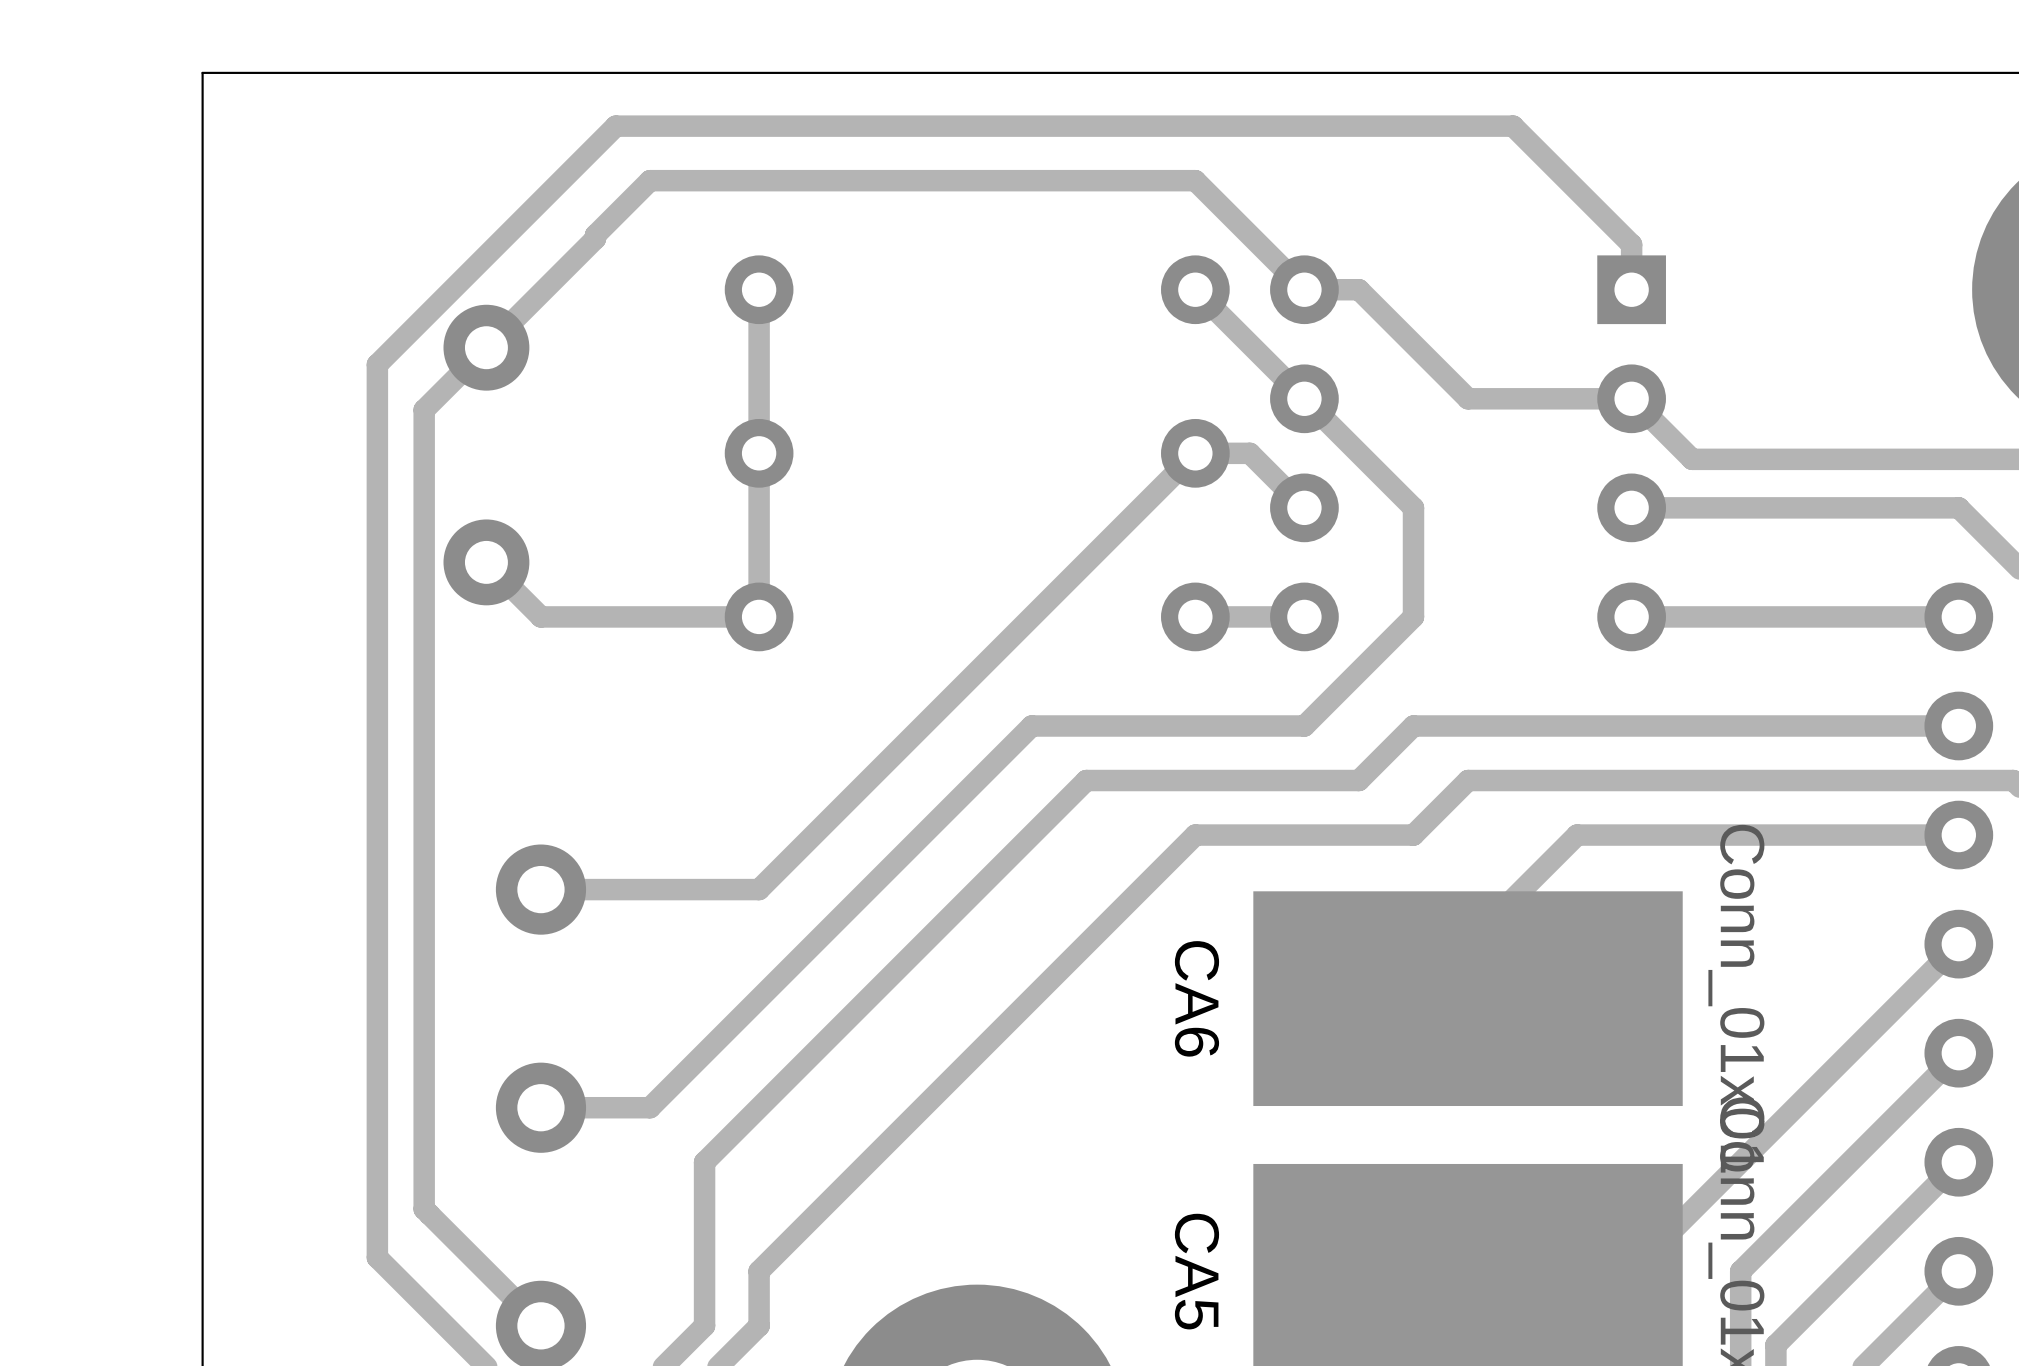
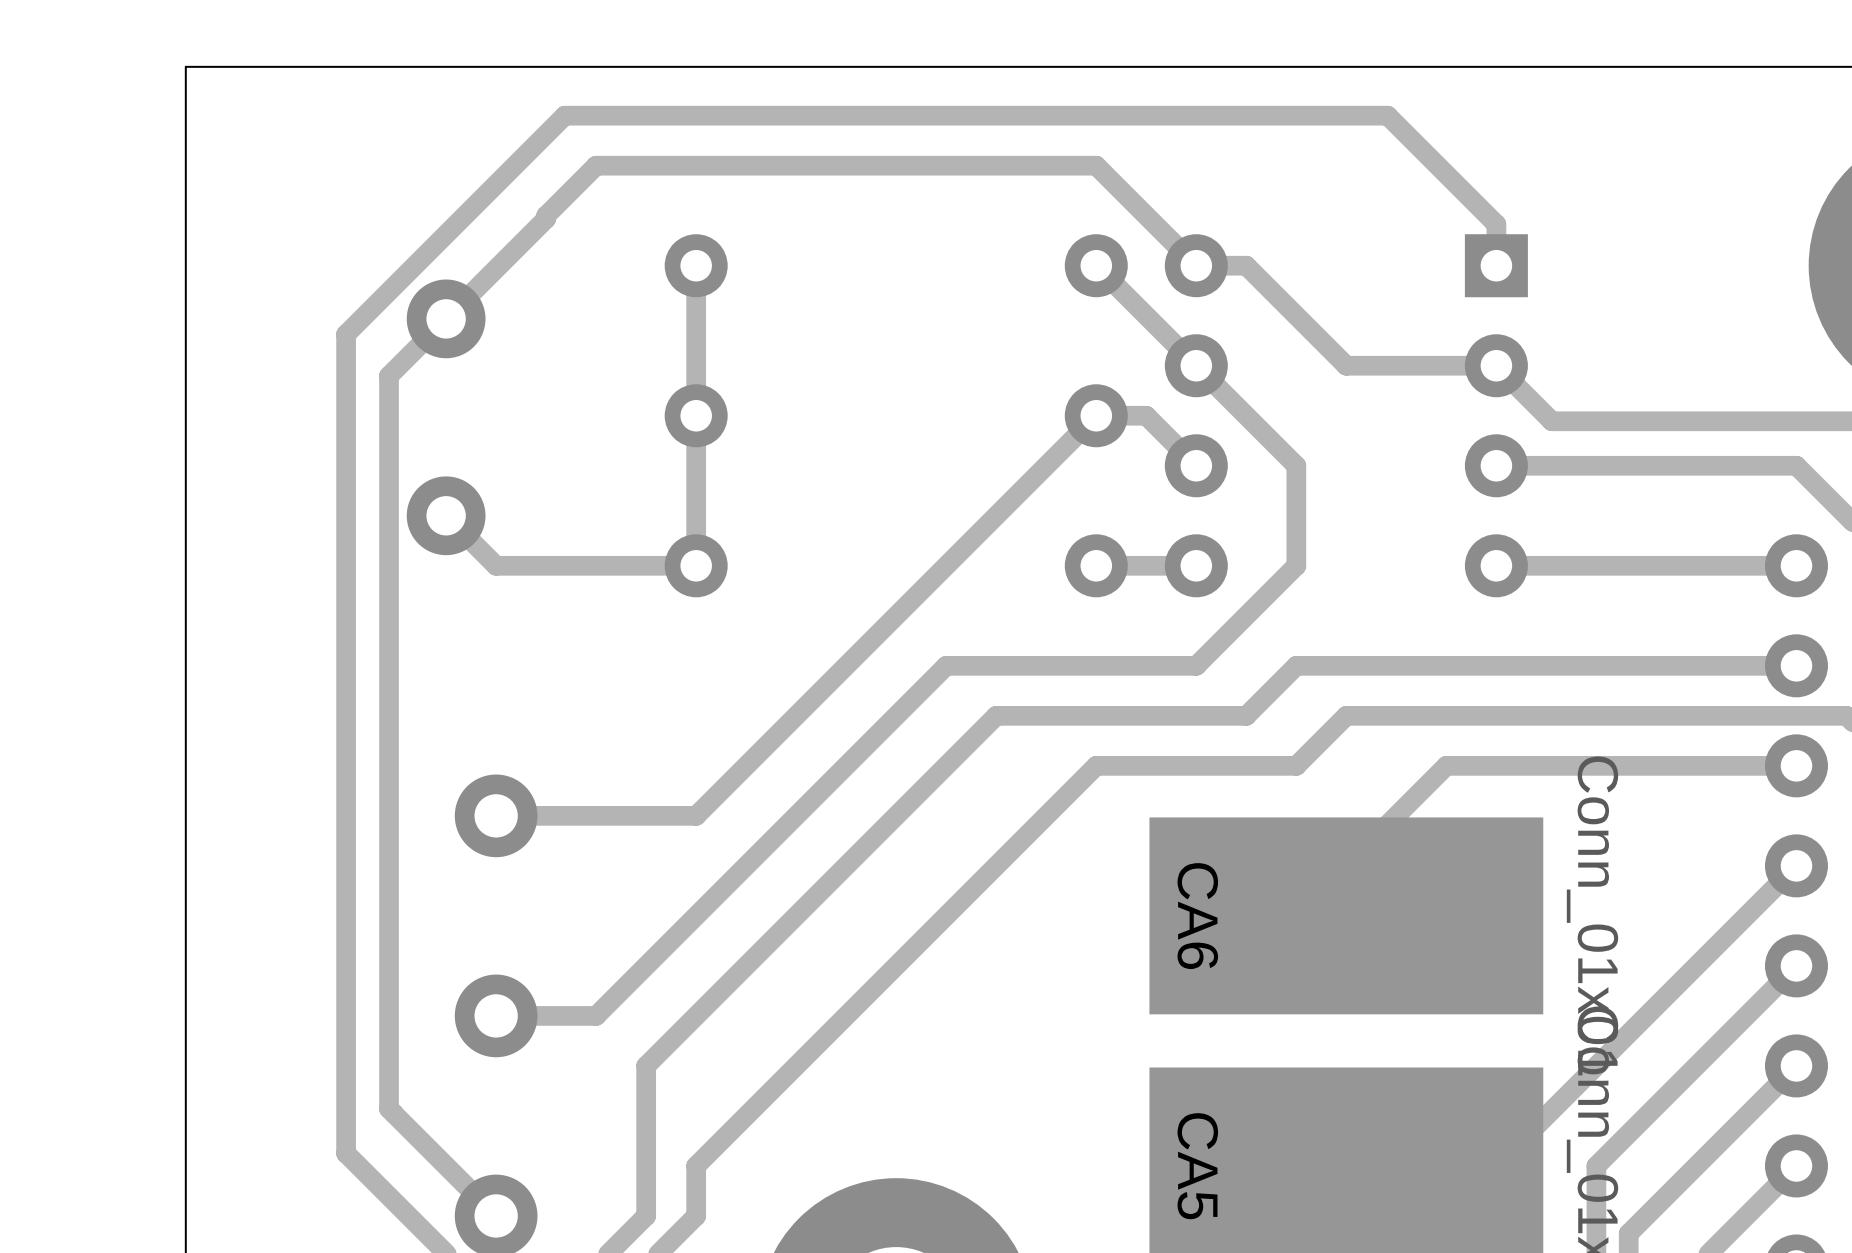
CA6 name position: CA6 (1196, 998) -> CA6 (1197, 916)
CA5 name position: CA5 (1196, 1271) -> CA5 (1197, 1166)

